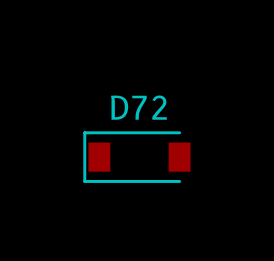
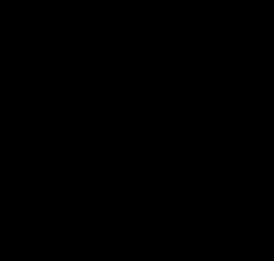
D72: (136, 157) -> none

